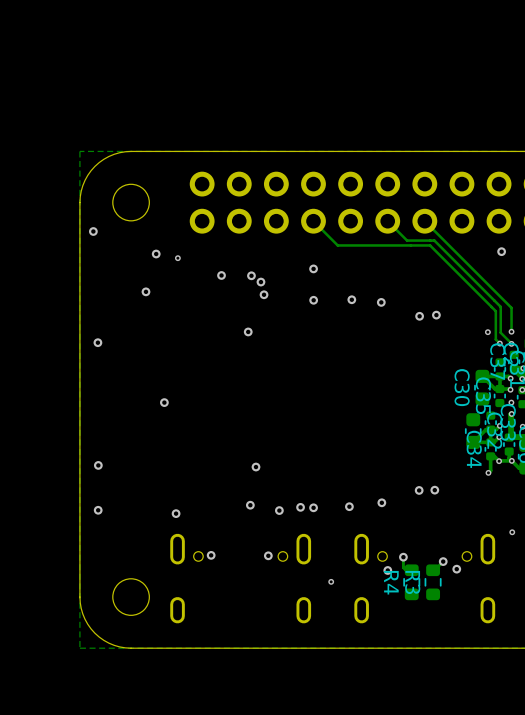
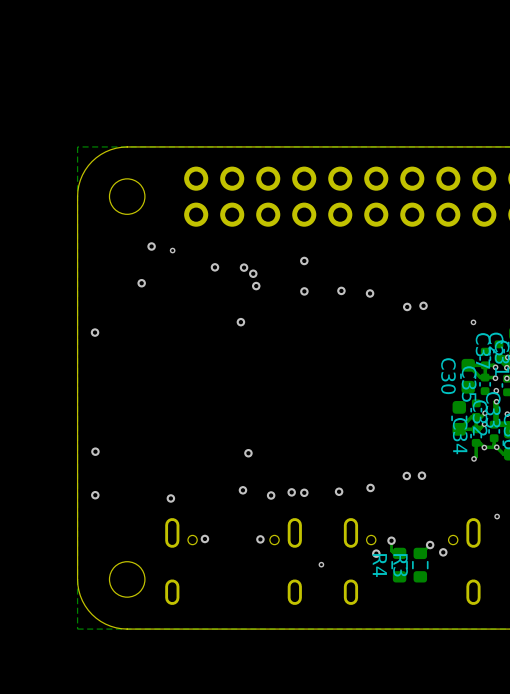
track: (313, 221) (337, 245) (430, 245) (495, 311) (495, 339) (499, 343) -> none
track: (387, 221) (407, 240) (434, 240) (500, 306) (500, 332) (511, 343) -> none
track: (424, 221) (511, 307) (511, 331) -> none
via: (93, 231) -> none
via: (501, 251) -> none
via: (511, 331) -> none
via: (499, 343) -> none
via: (511, 343) -> none
via: (164, 402) -> none

